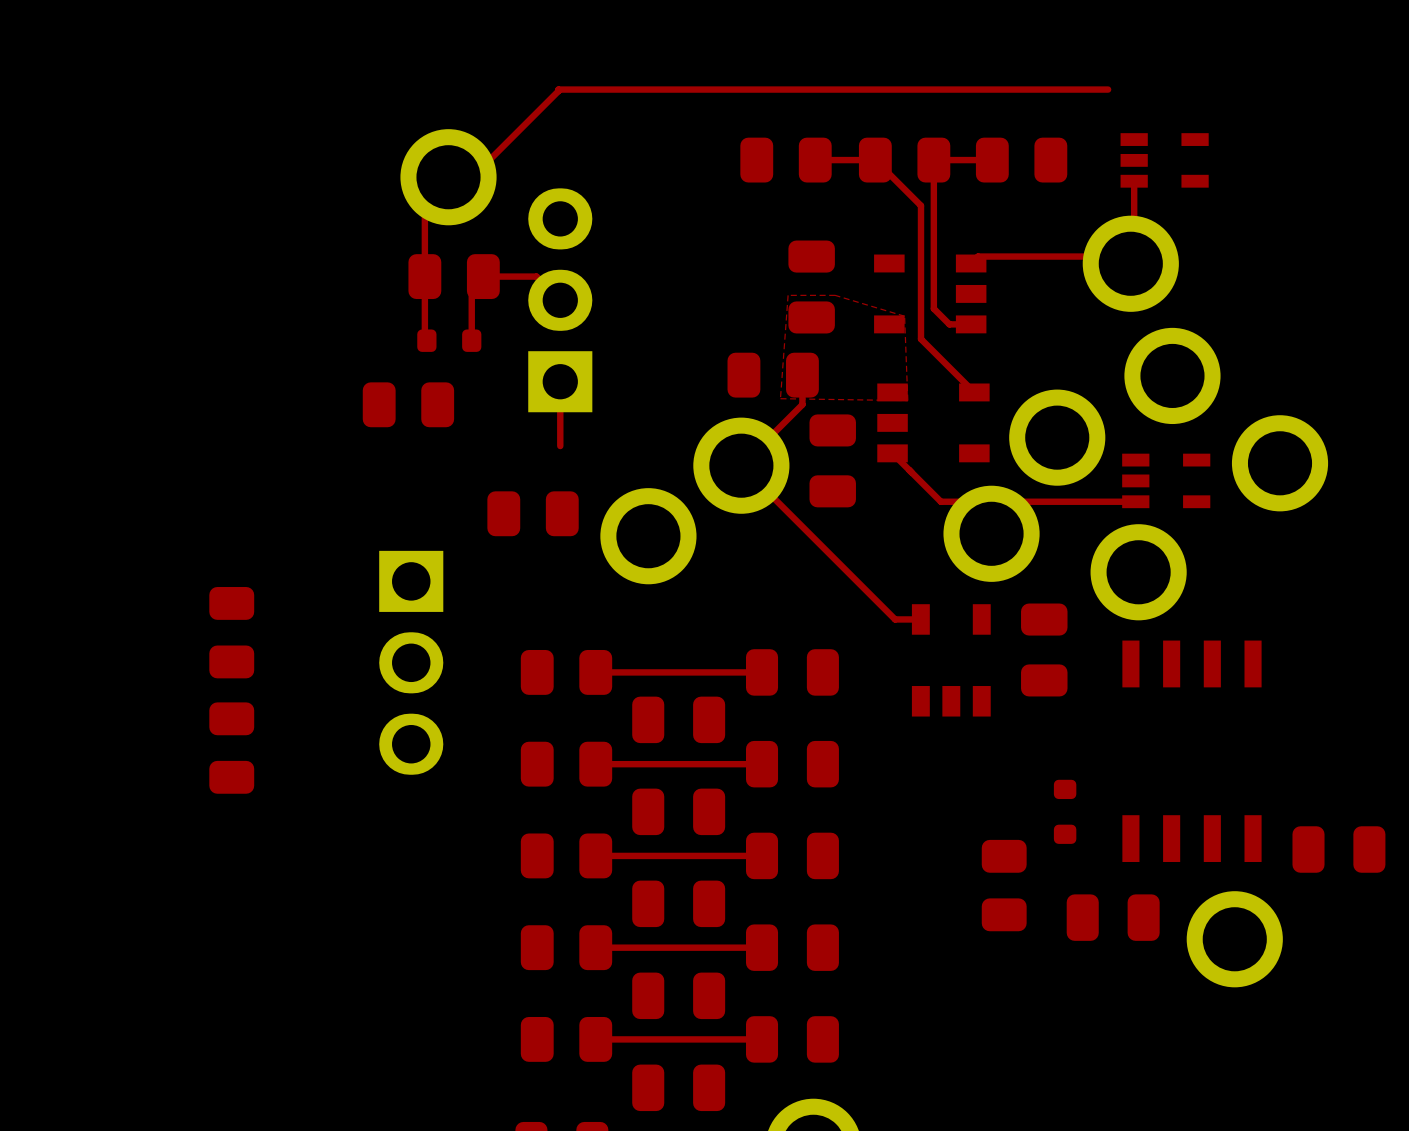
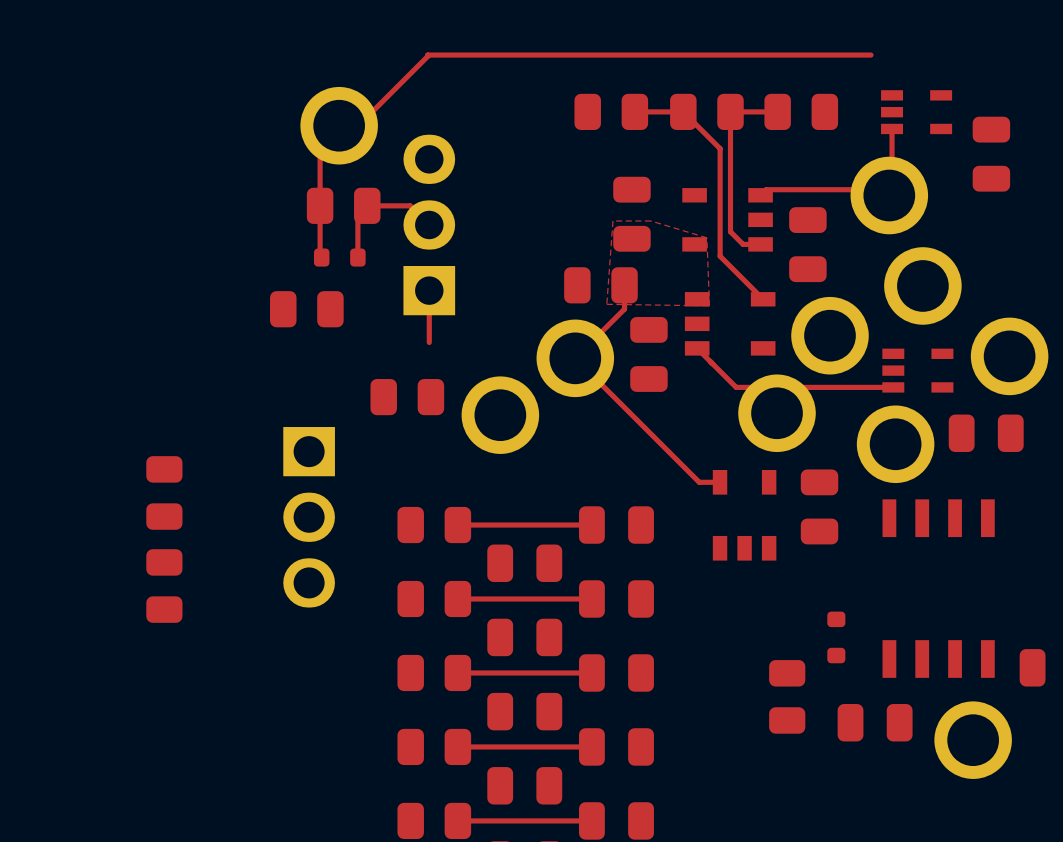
part: none -> (991, 154)
part: none -> (807, 244)
part: none -> (986, 433)

